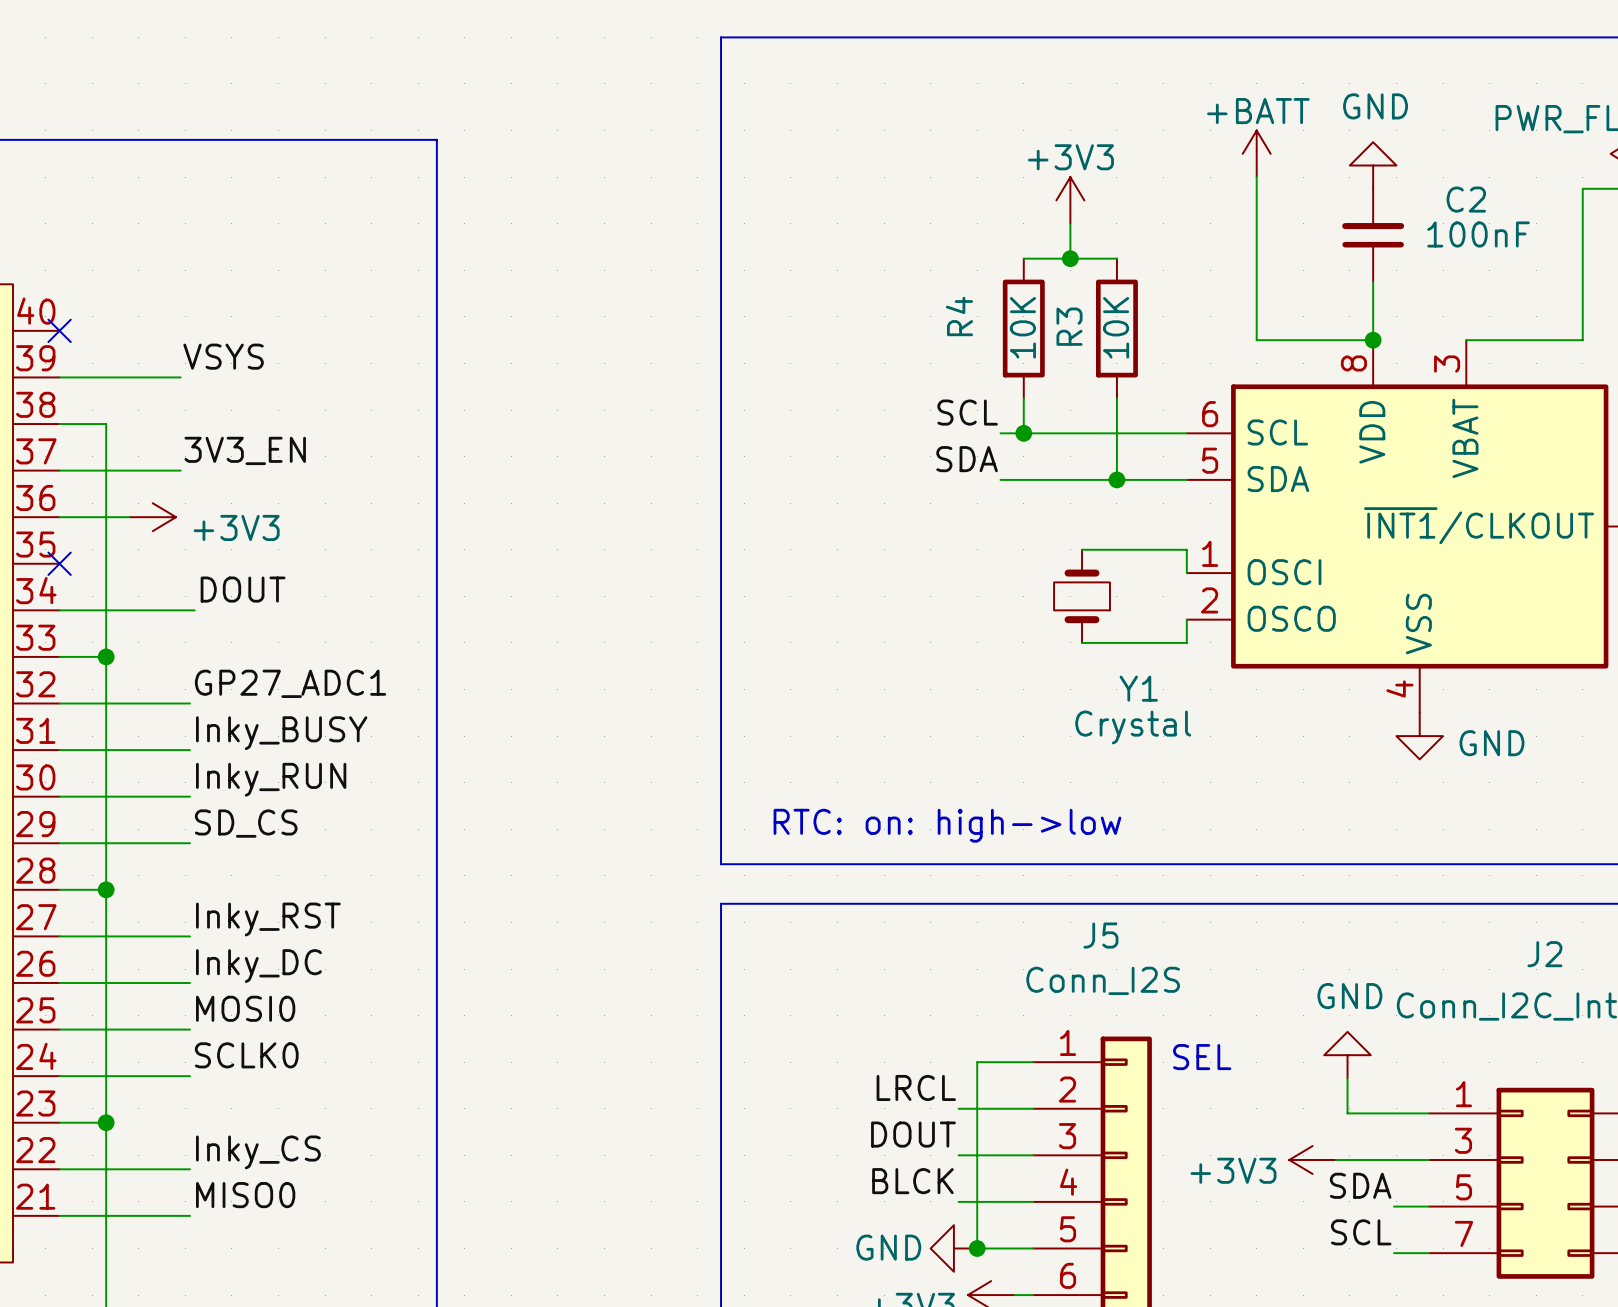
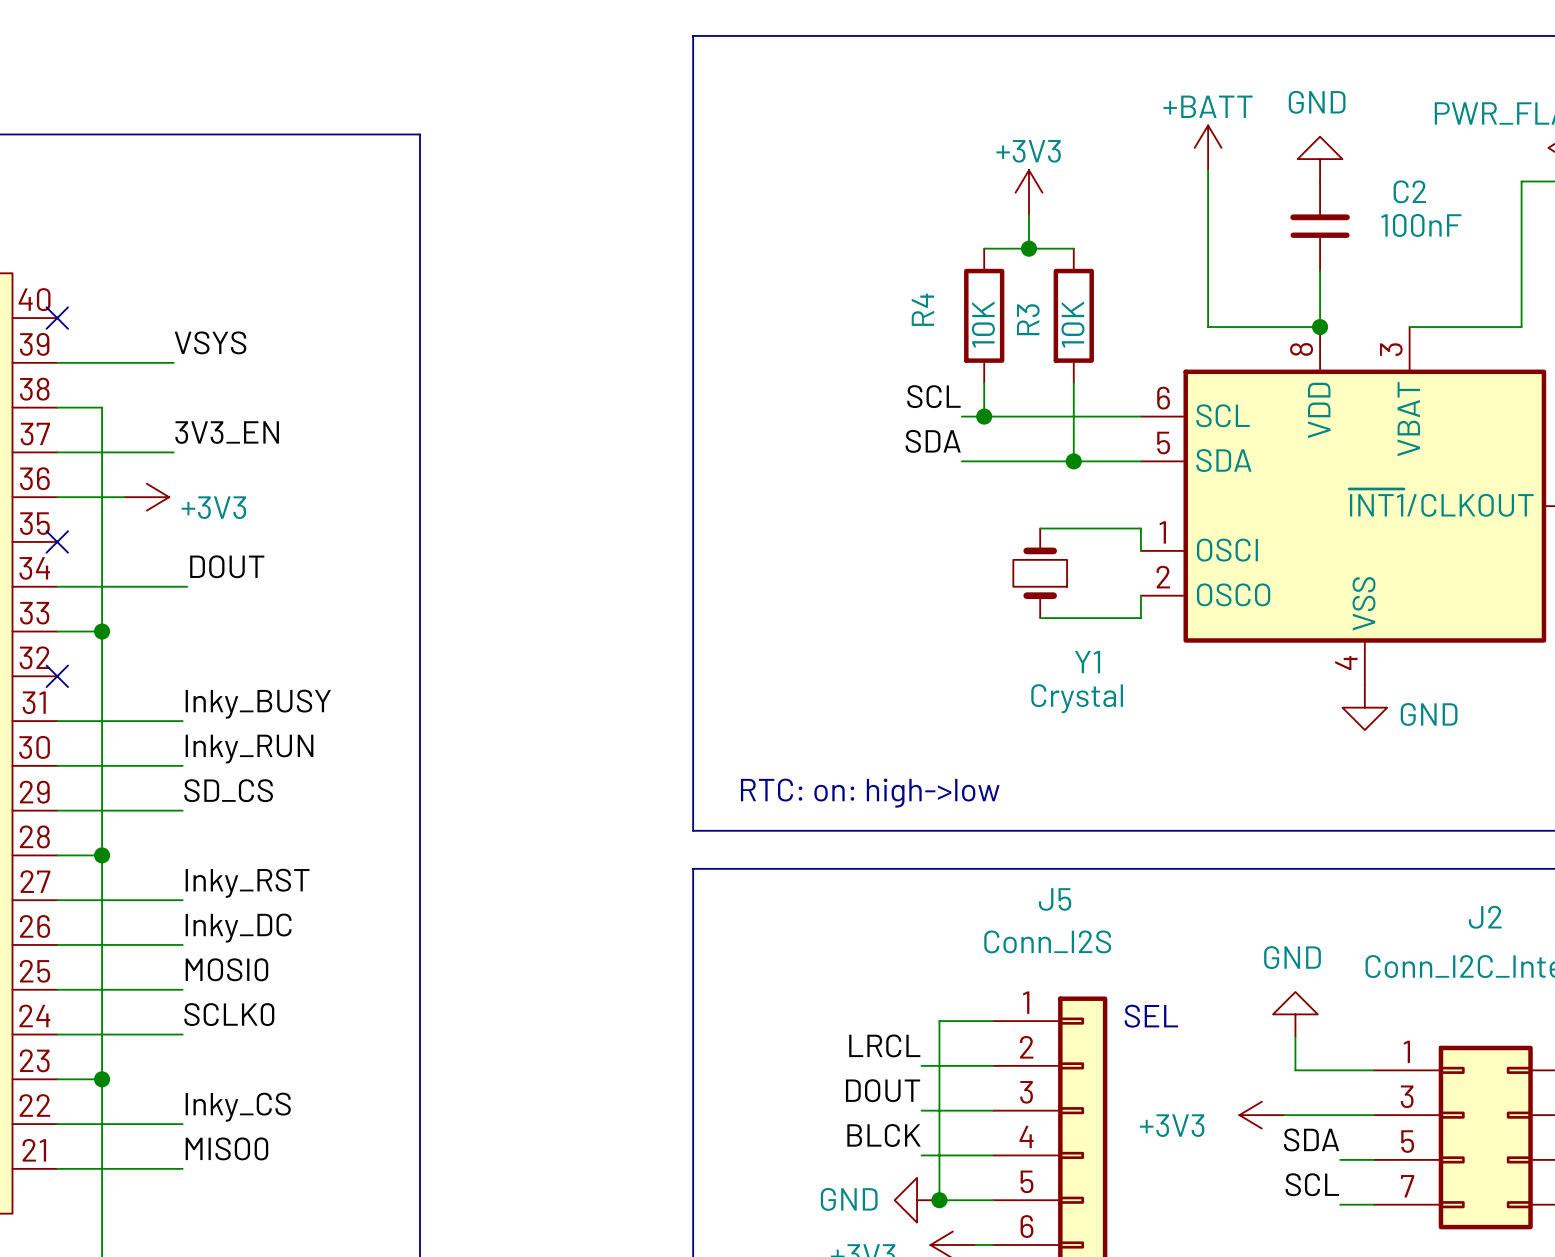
label: GP27_ADC1 (290, 683) -> none
wire: (59, 703) (190, 703) -> none
no-connect mark: none -> (57, 676)

